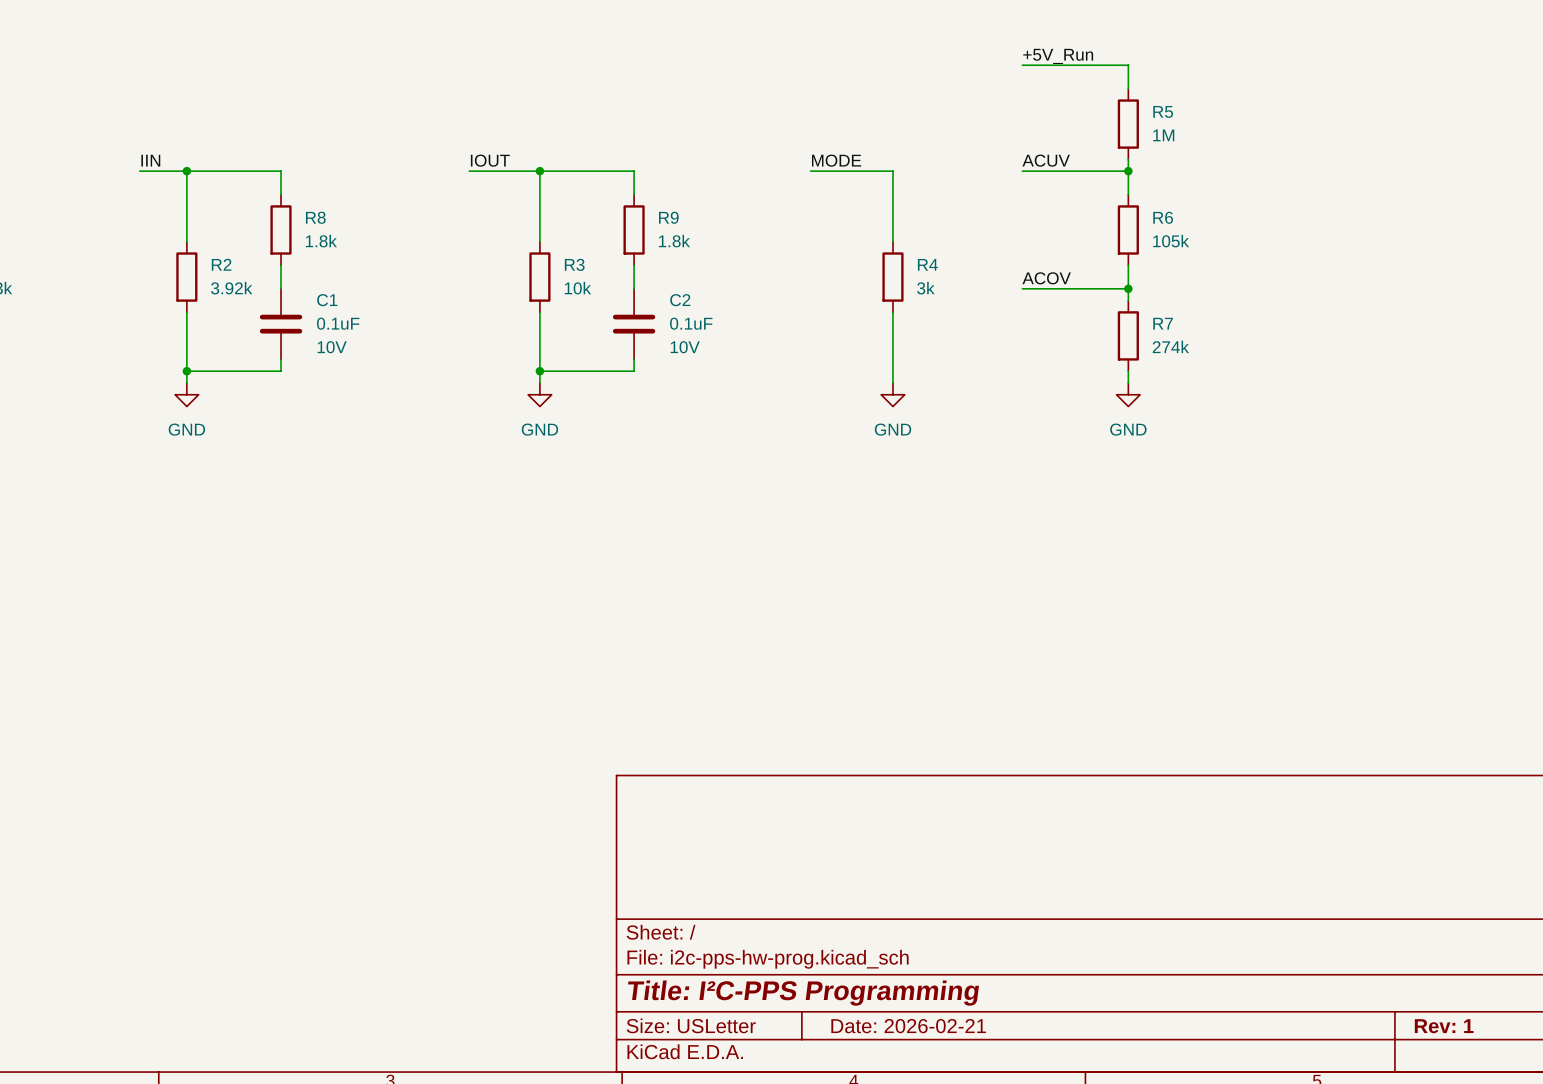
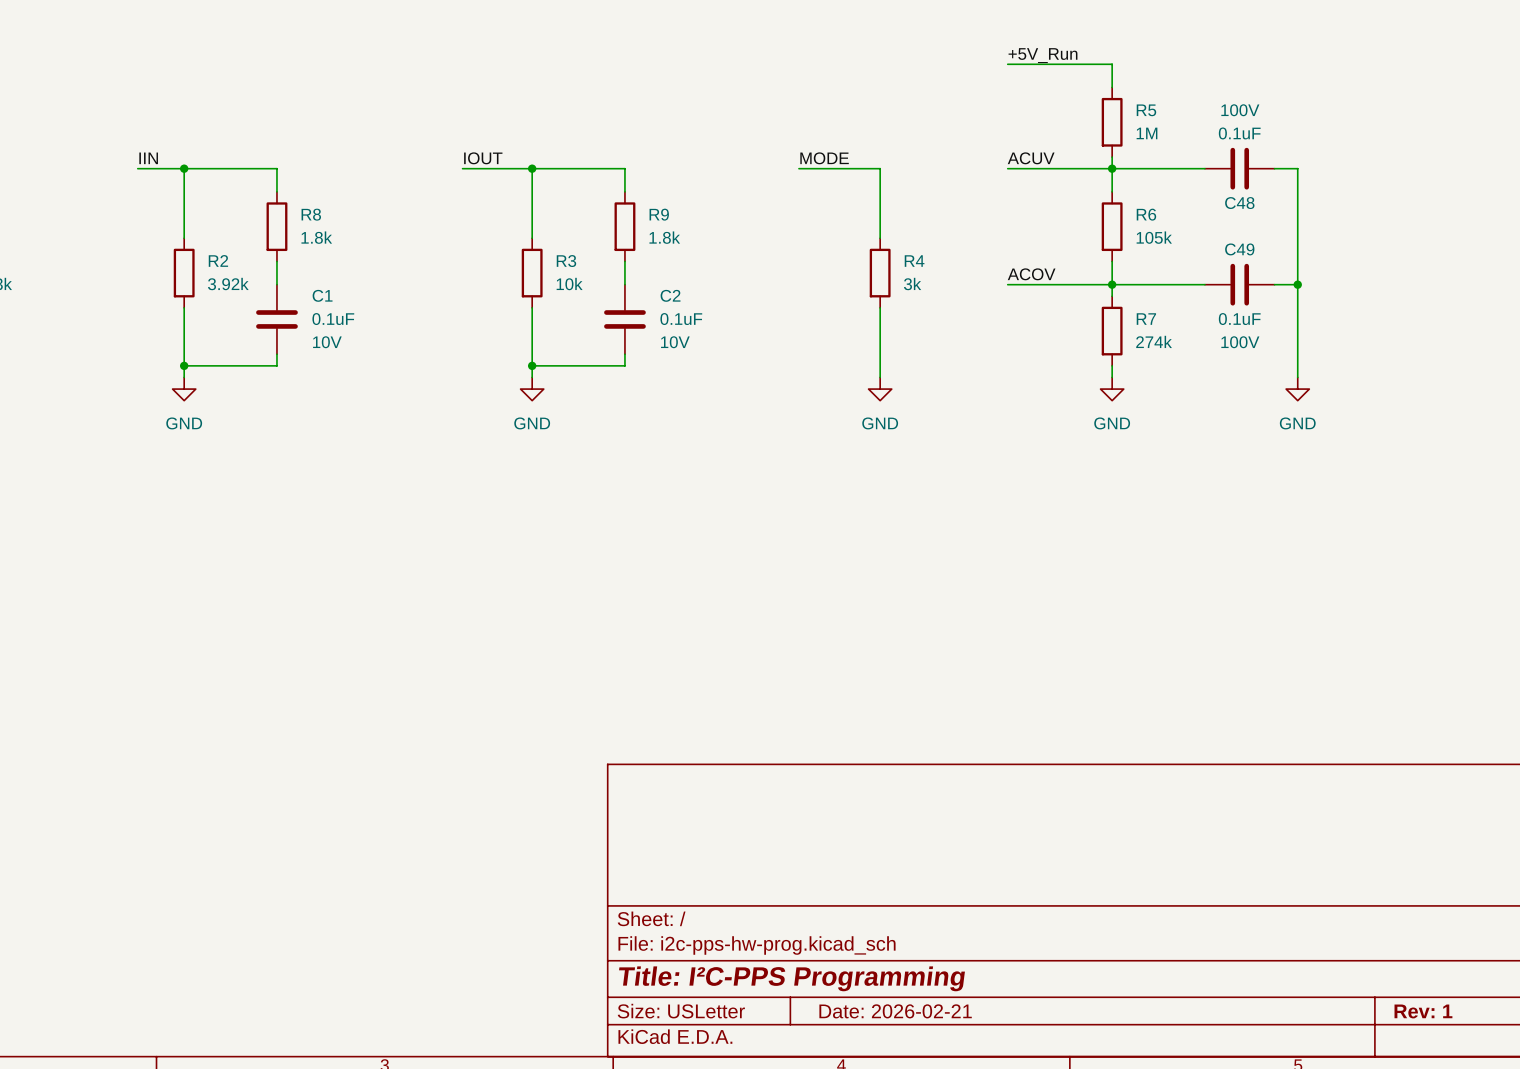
wire: none -> (1112, 168) (1204, 168)
C48: none -> 0.1uF (1239, 168)
wire: none -> (1274, 168) (1297, 168) (1297, 377)
wire: none -> (1112, 284) (1204, 284)
C49: none -> 0.1uF (1239, 284)
wire: none -> (1274, 284) (1297, 284)
junction: none -> (1297, 284)
power symbol: none -> GND (1297, 389)

